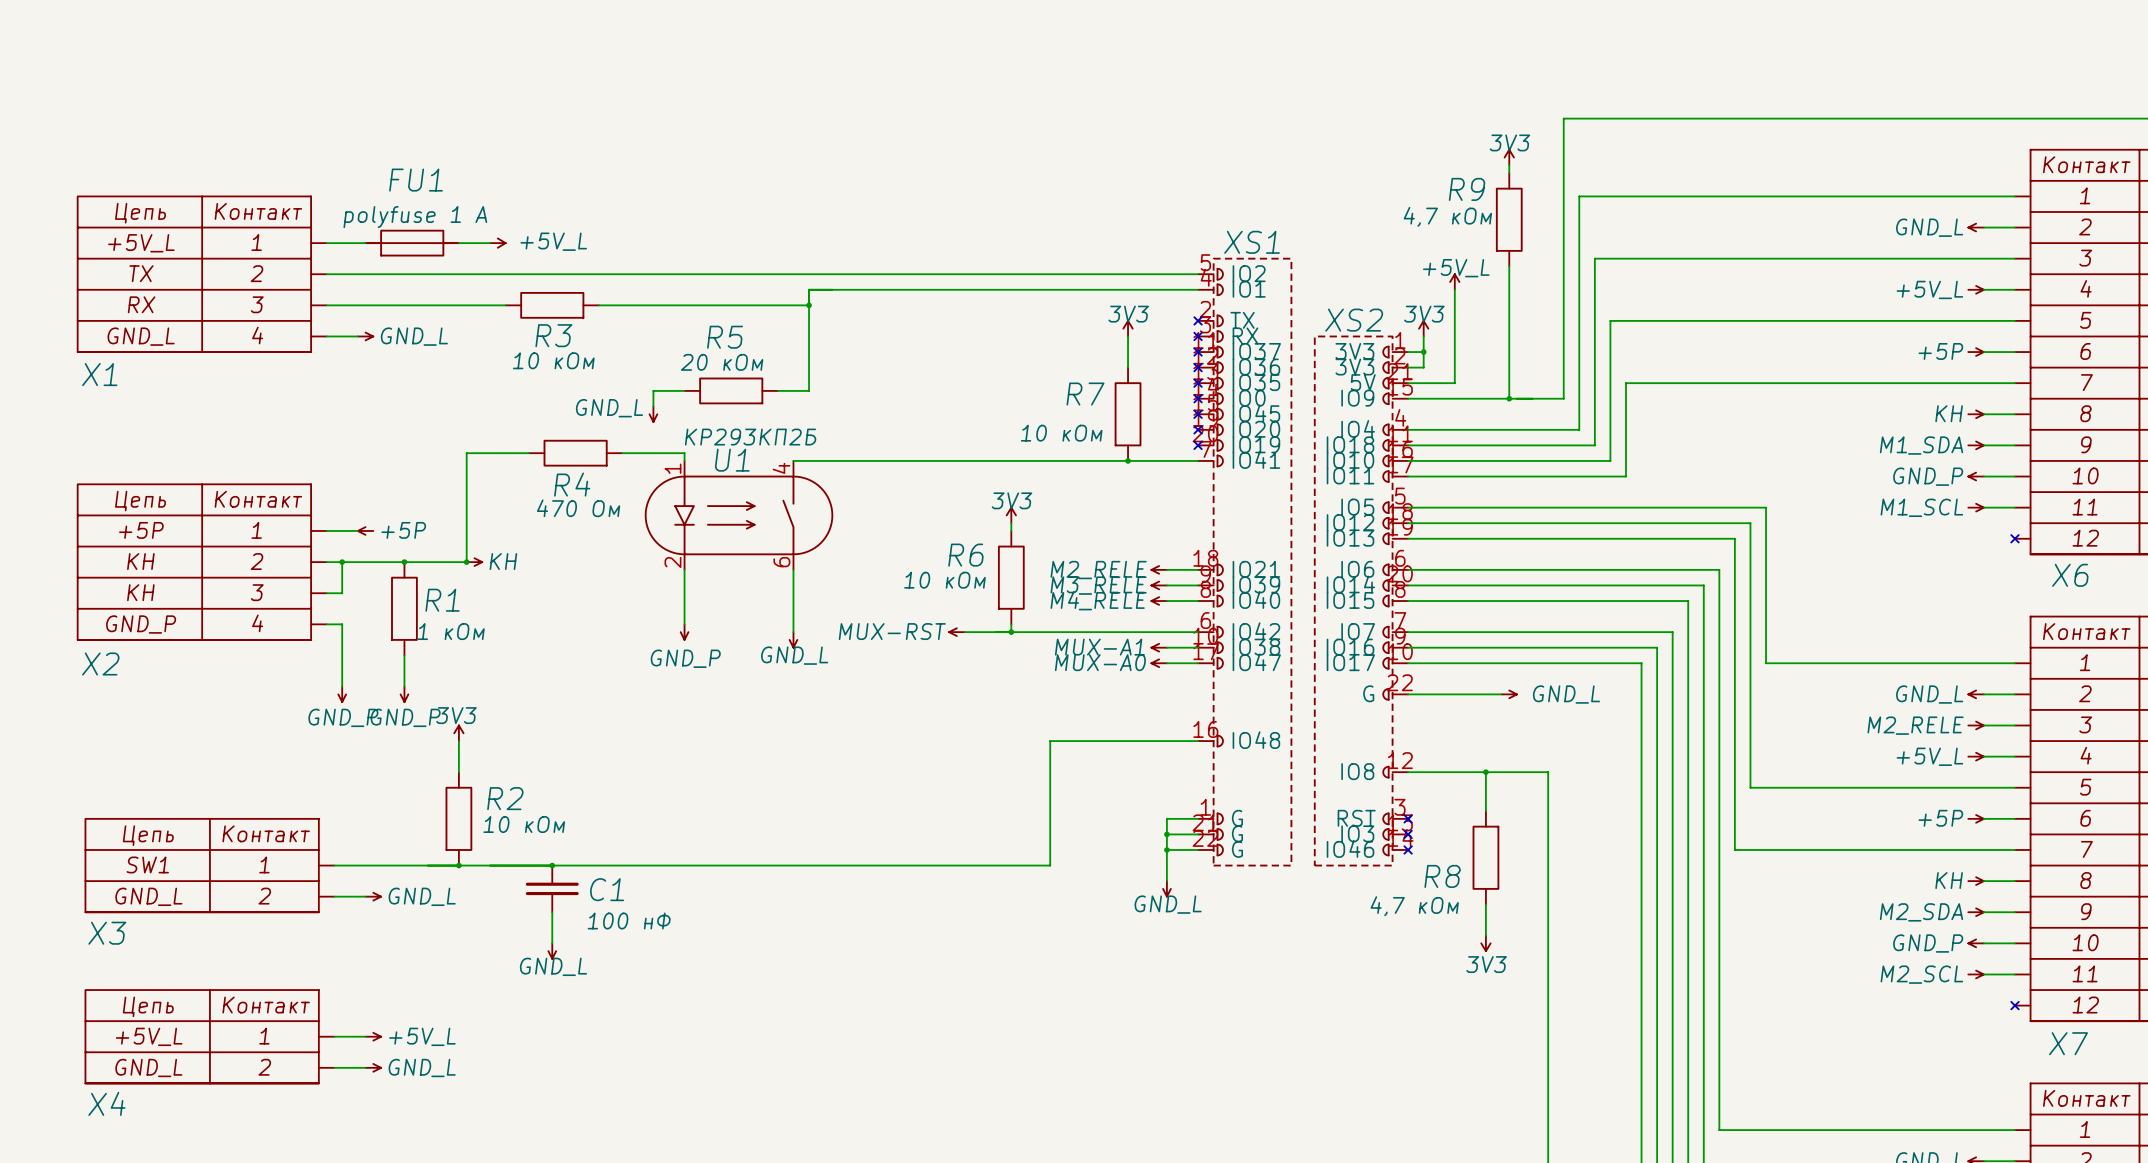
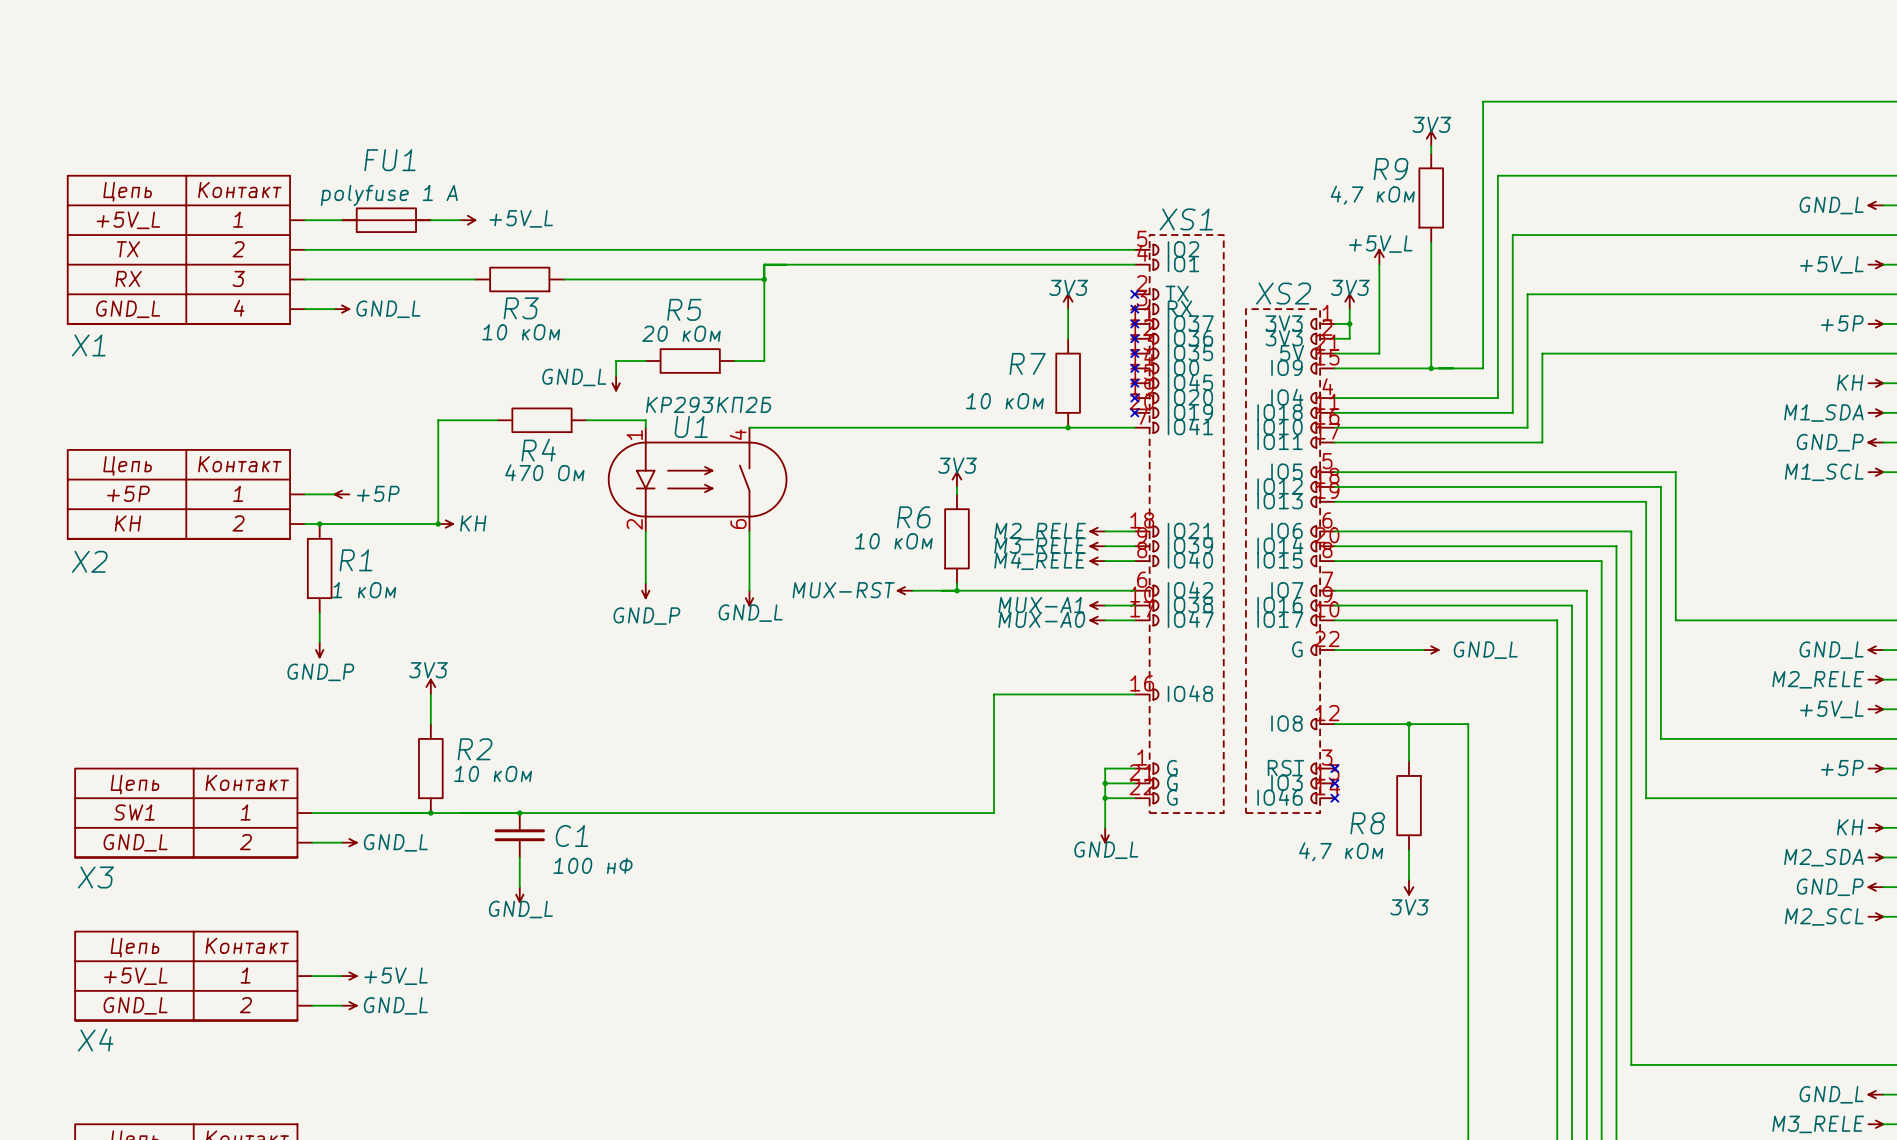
X2 symbol: [77, 483, 327, 641] -> [67, 449, 305, 540]
wire: (342, 562) (342, 593) (326, 593) -> none
junction: (404, 562) -> none
R1 position: (404, 608) -> (319, 568)
wire: (326, 624) (342, 624) (342, 655) -> none
wire: (404, 655) (404, 686) -> none
X2 name position: X2 (100, 663) -> X2 (89, 561)
power symbol: GND_P (404, 694) -> none

